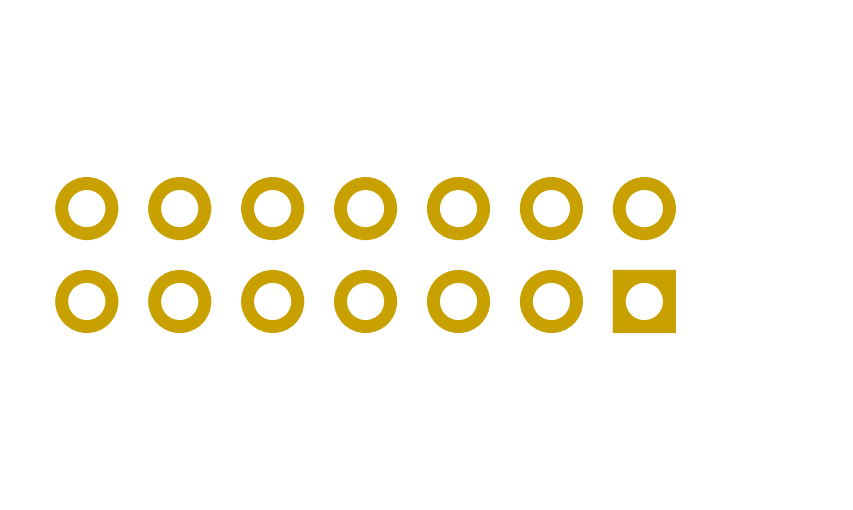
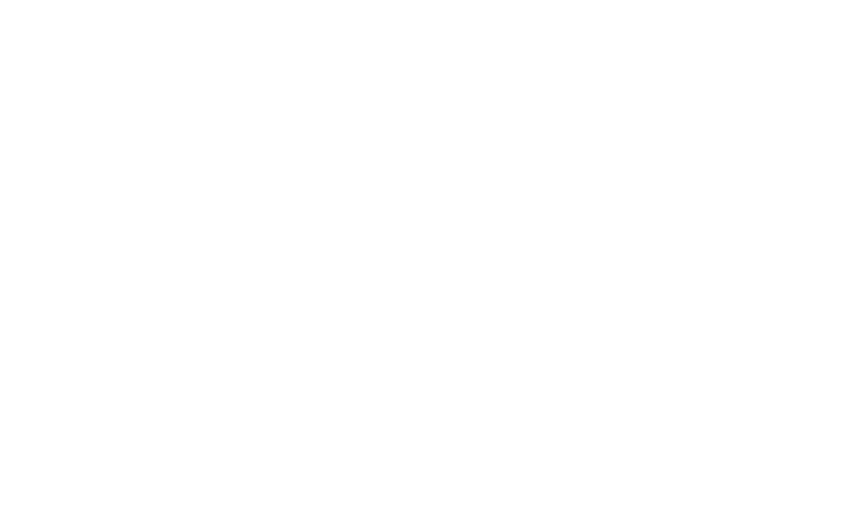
part: (365, 255) -> none

